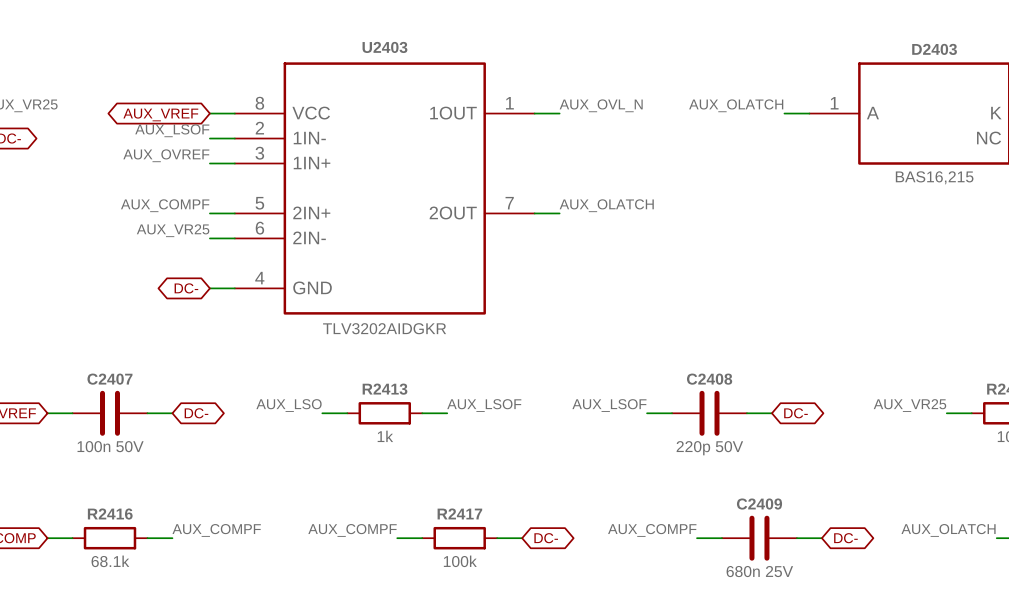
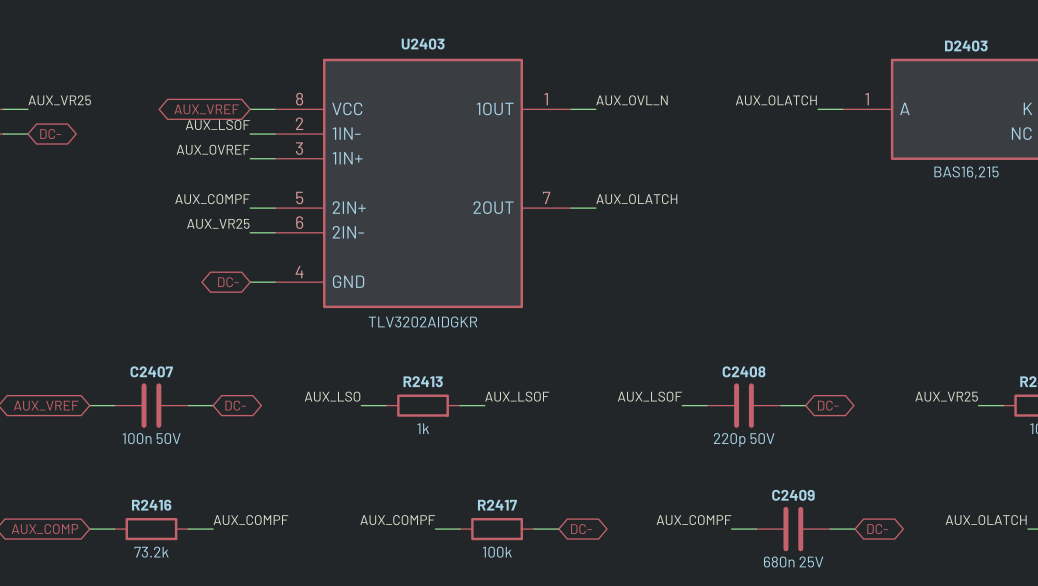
R2416 value: 68.1k (110, 561) -> 73.2k (151, 552)

